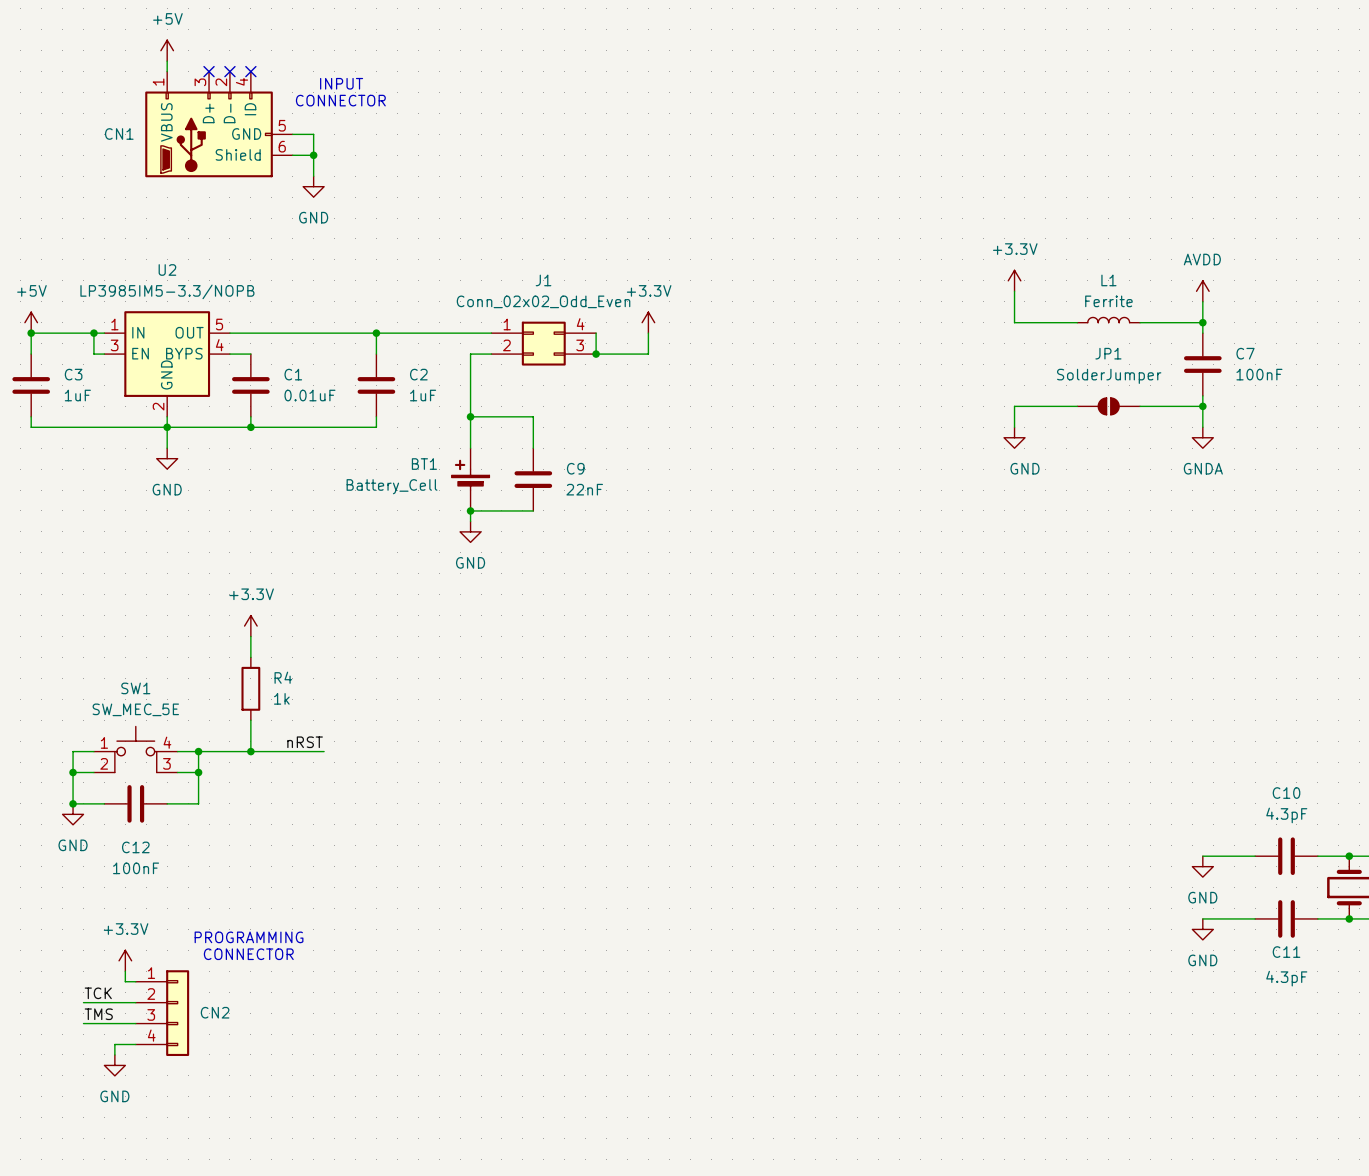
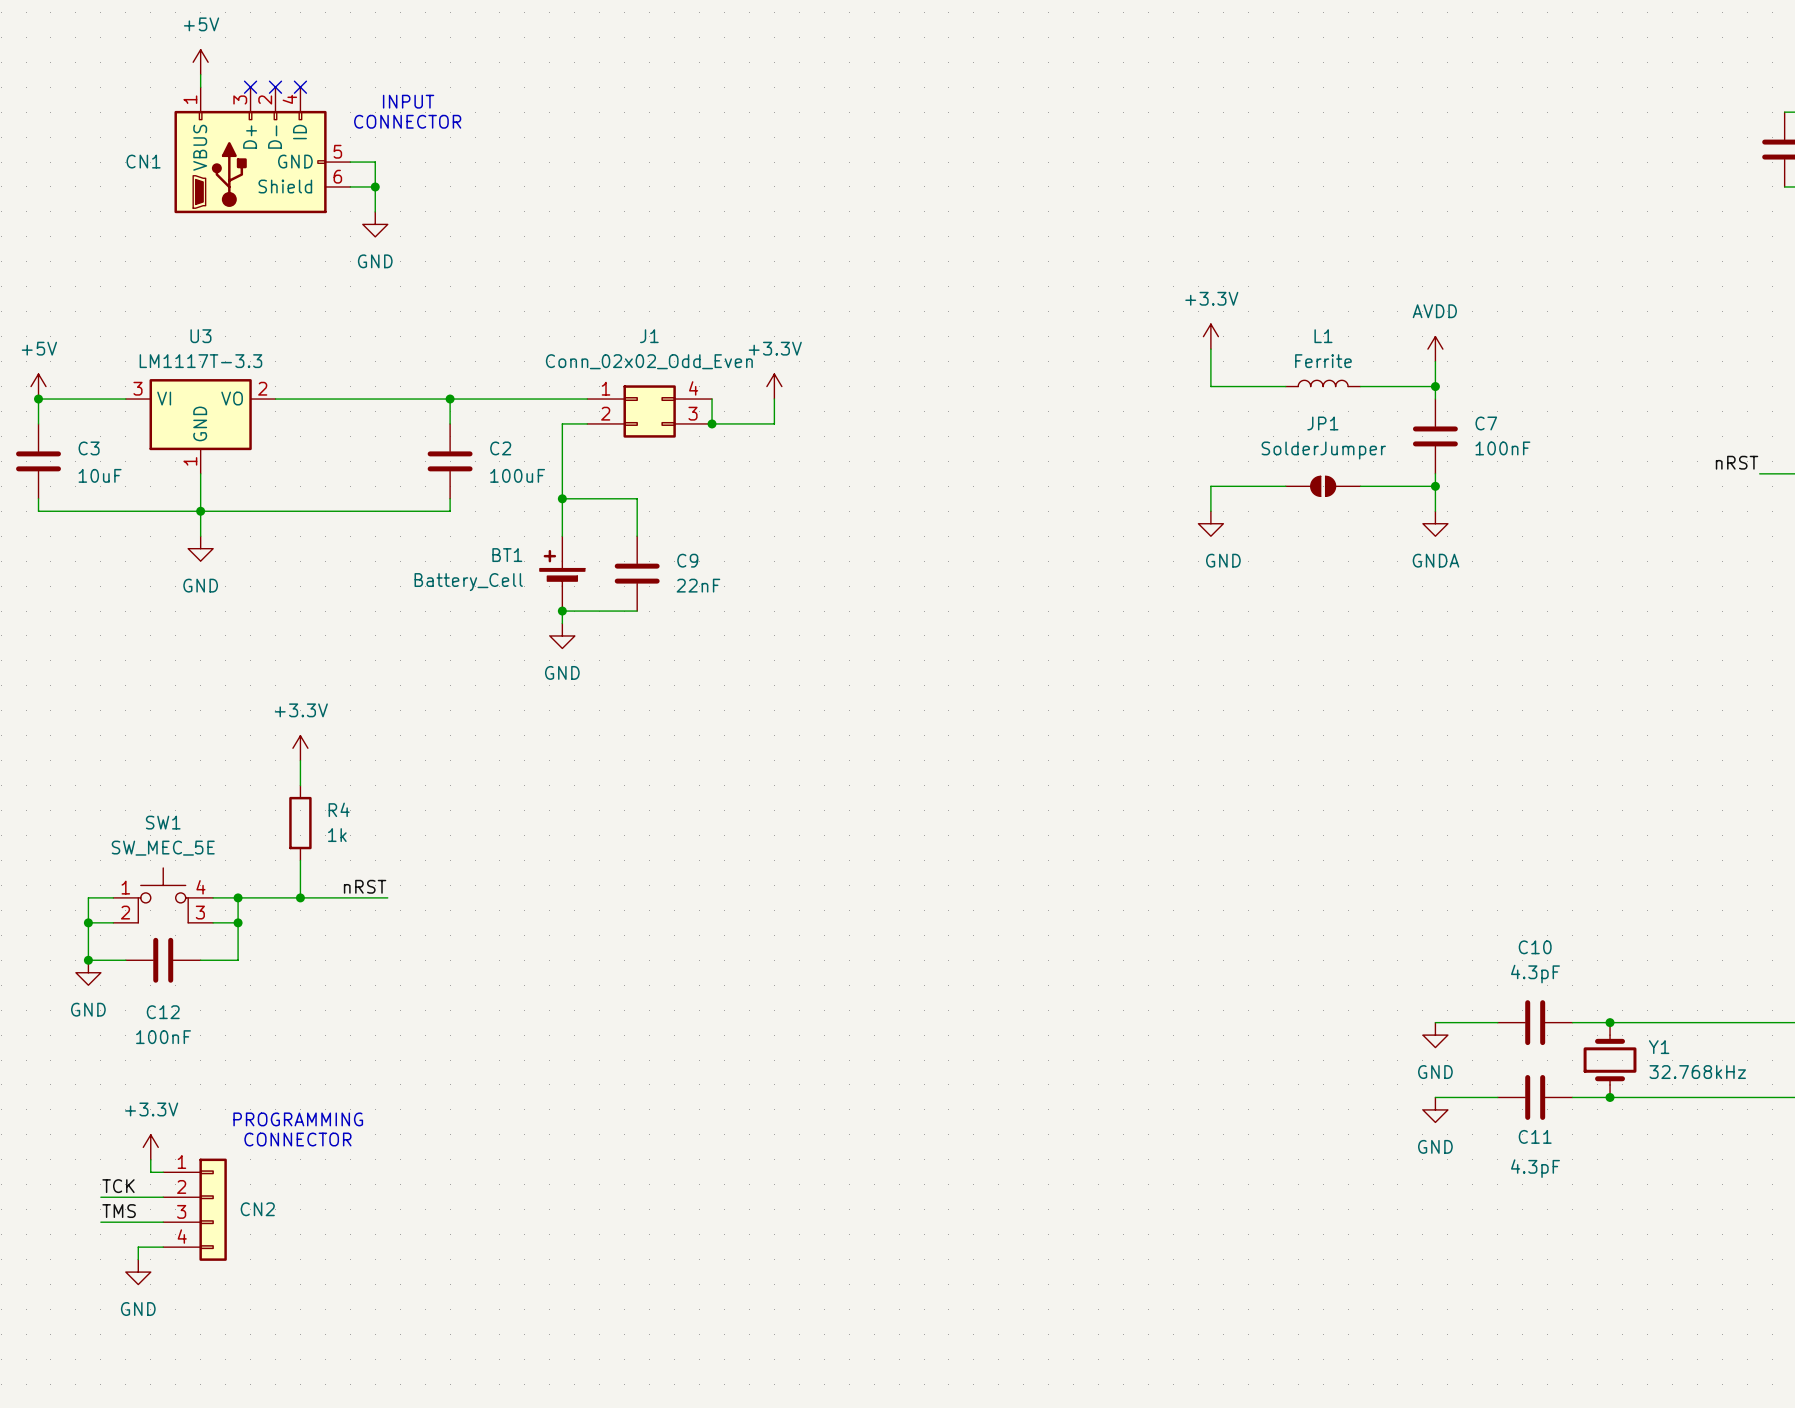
wire: (93, 333) (93, 354) (104, 354) -> none
junction: (93, 333) -> none
wire: (229, 354) (250, 354) -> none
U3: none -> LM1117T-3.3 (200, 426)
U2: LP3985IM5-3.3/NOPB (167, 364) -> none
C1: 0.01uF (250, 385) -> none
C3 value: 1uF (77, 395) -> 10uF (100, 475)
C2 value: 1uF (423, 395) -> 100uF (517, 475)
wire: (250, 416) (250, 427) -> none
junction: (250, 427) -> none

